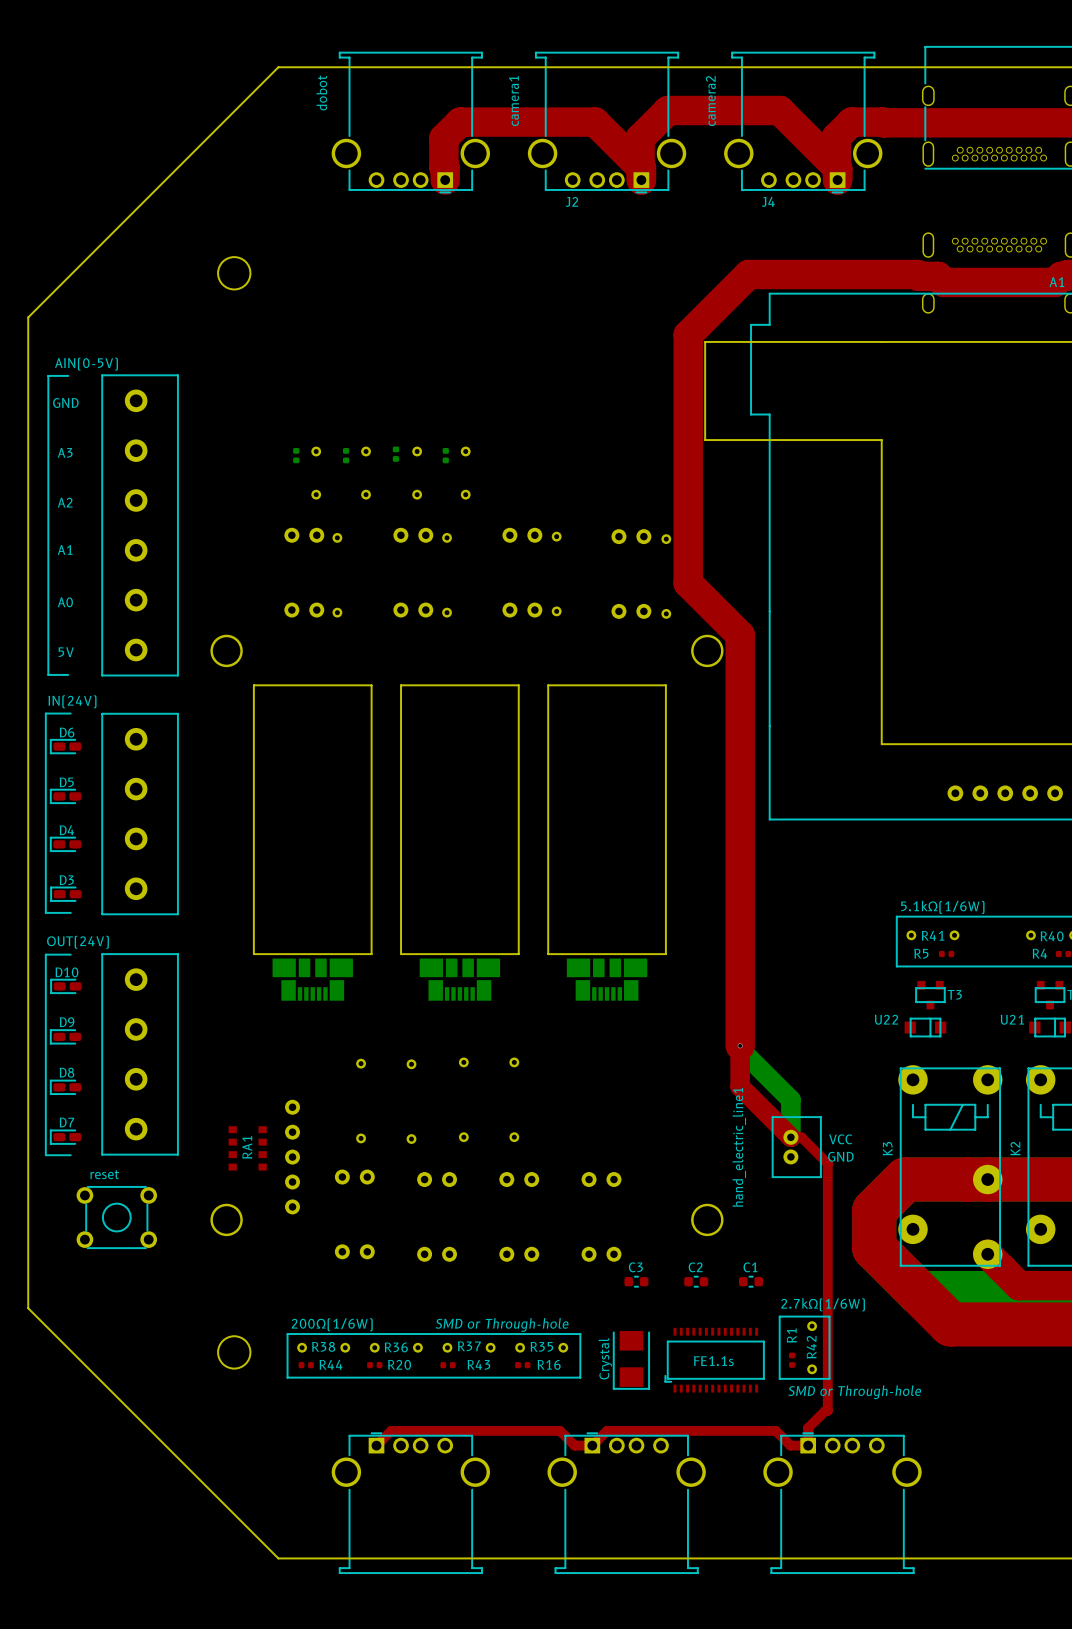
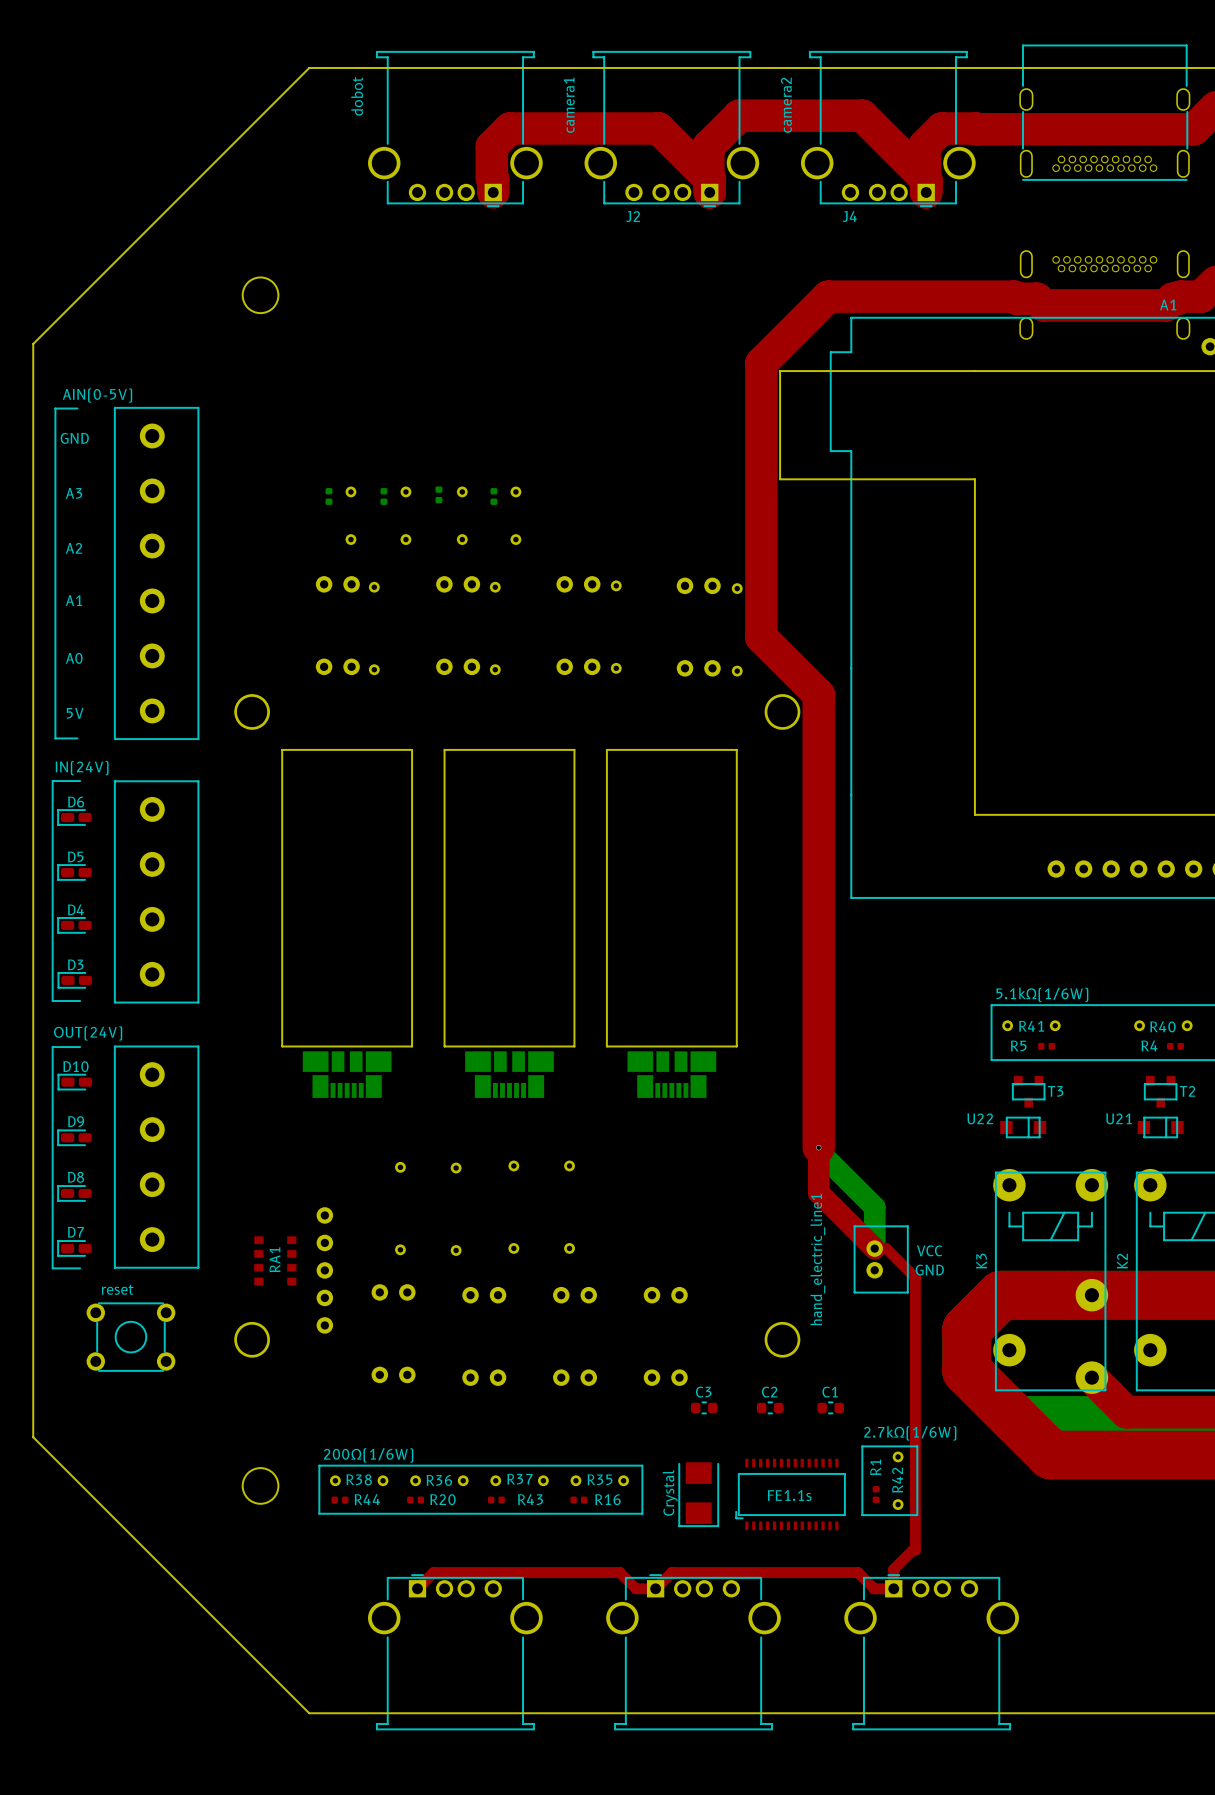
text: SMD or Through-hole (502, 1325) -> none
text: SMD or Through-hole (854, 1392) -> none

